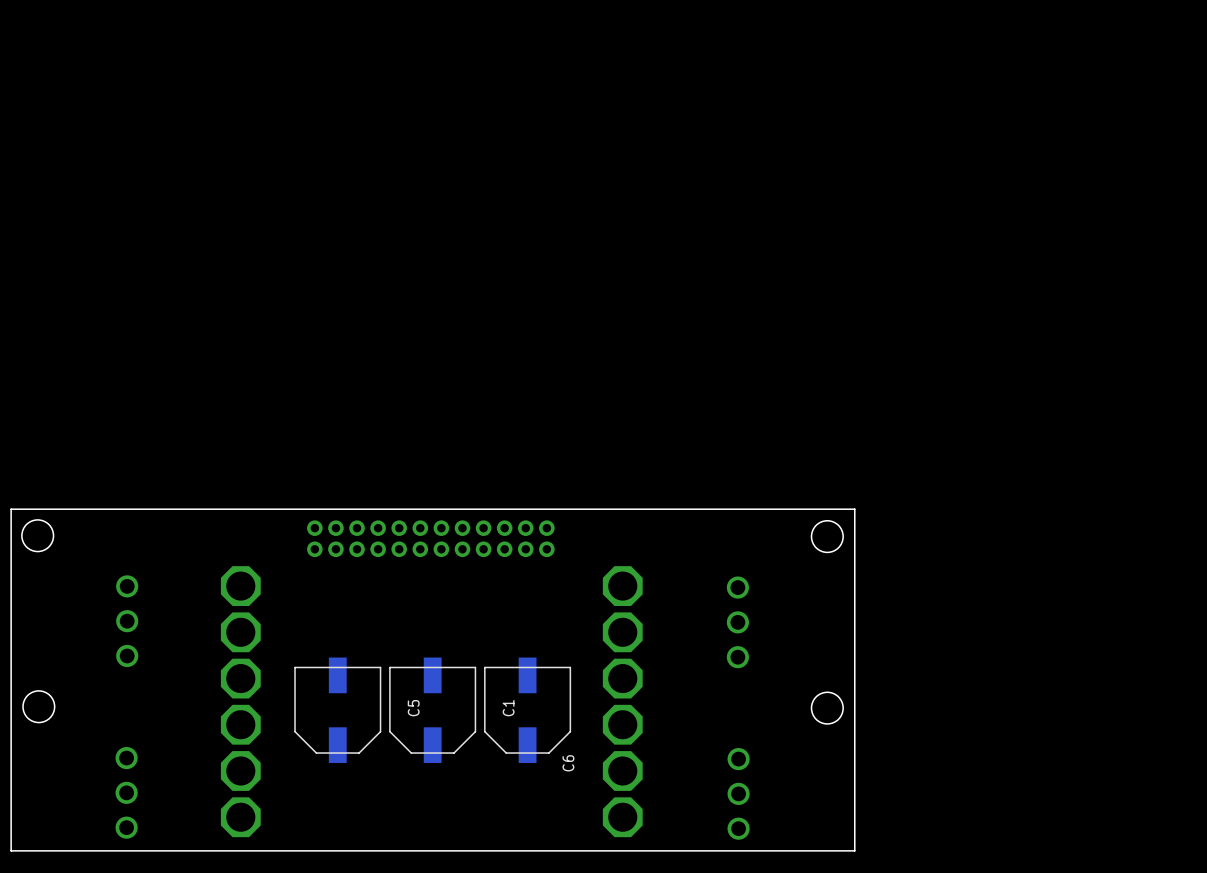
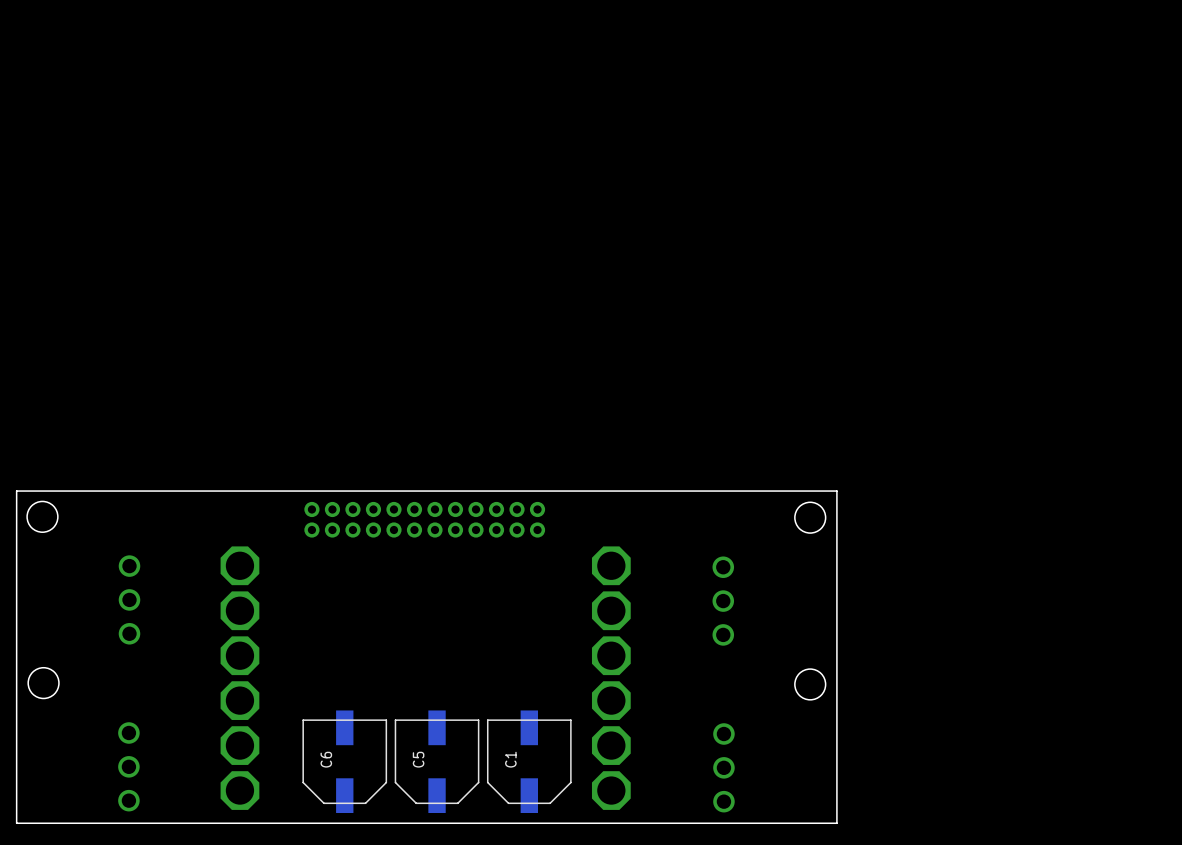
C6 position: (337, 710) -> (344, 761)
C5 position: (432, 710) -> (437, 761)
C1 position: (527, 710) -> (529, 761)
C6 name position: C6 (568, 763) -> C6 (326, 759)

